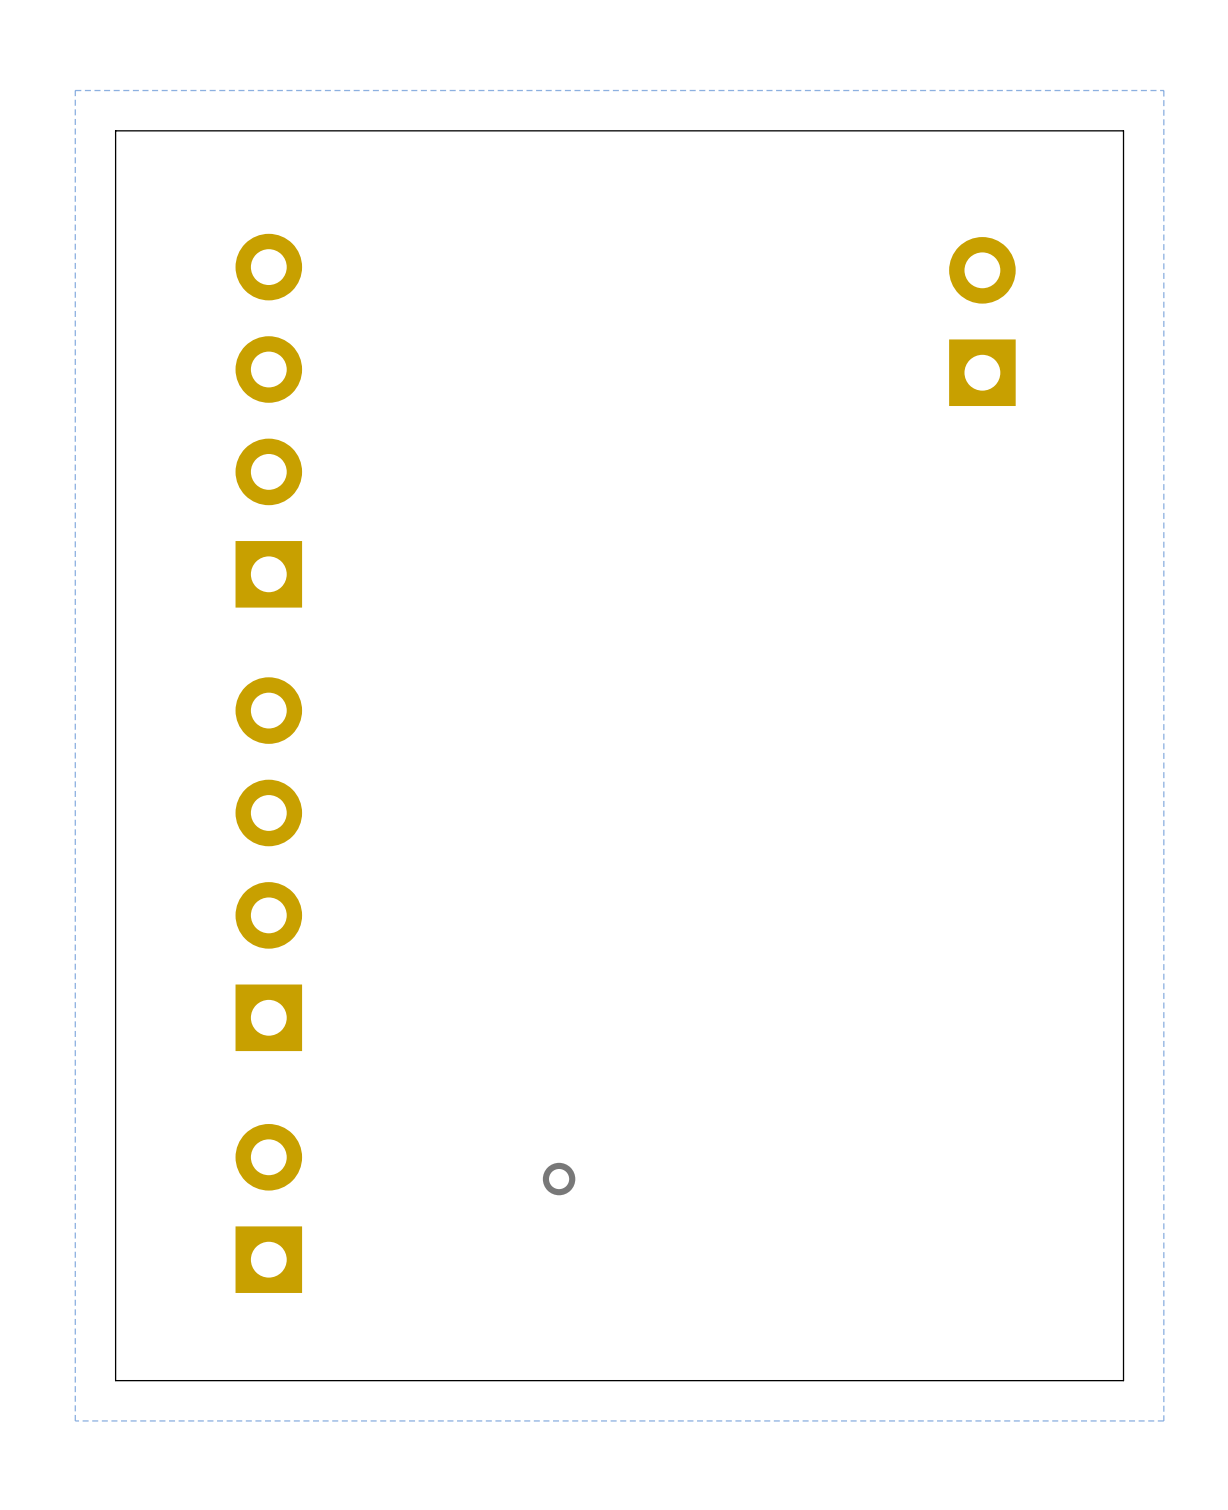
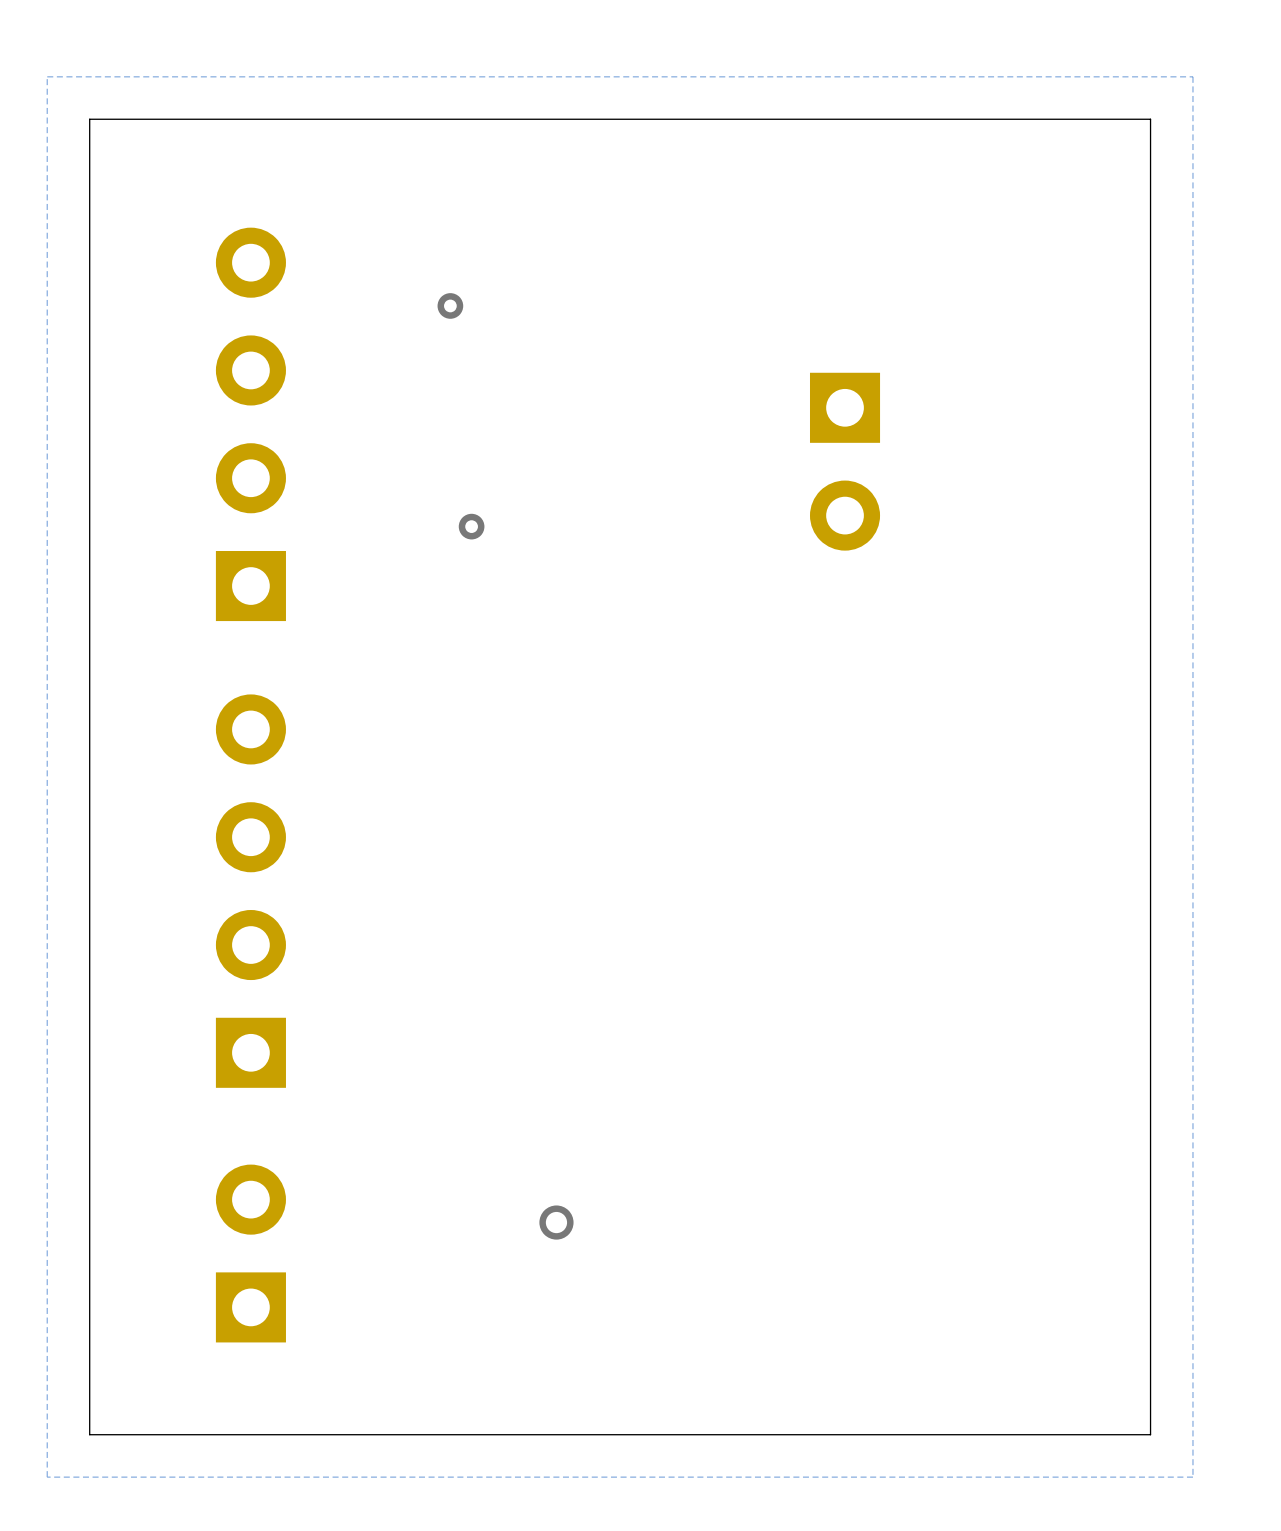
via: none -> (450, 305)
part rotation: 0° (982, 321) -> 180° (845, 461)
part position: (982, 321) -> (845, 461)
via: none -> (471, 526)

